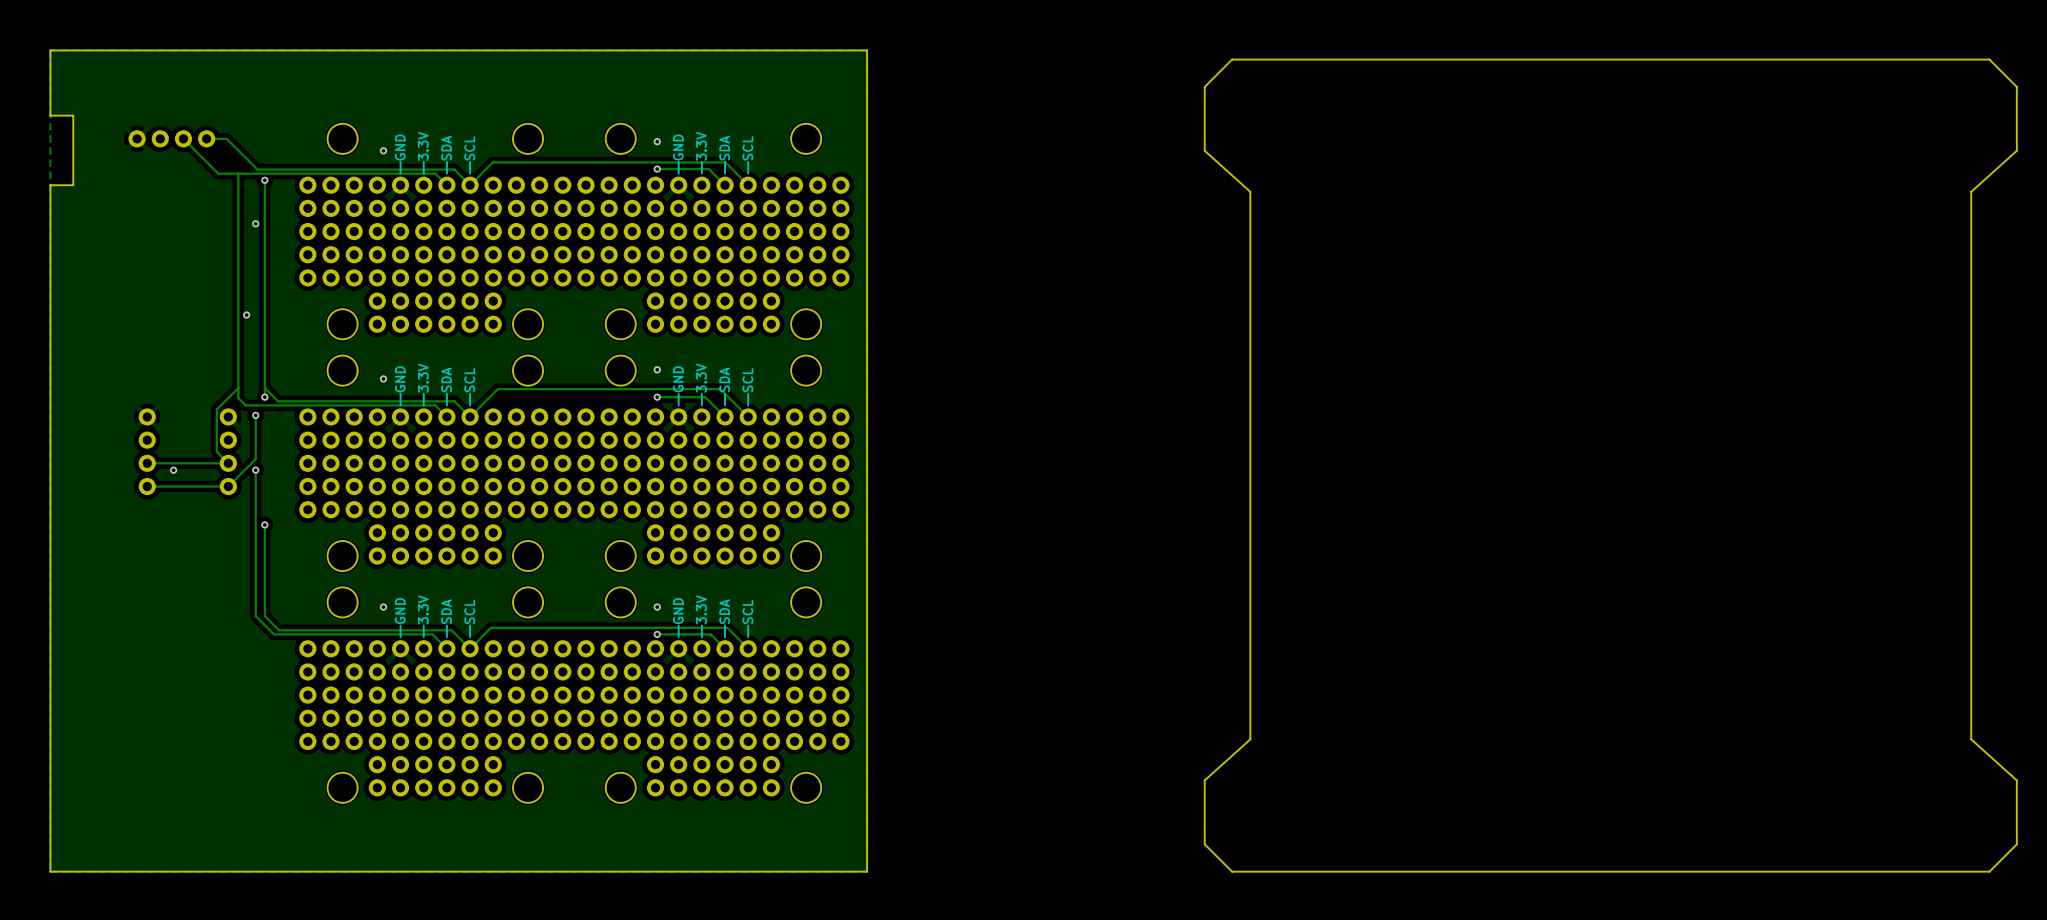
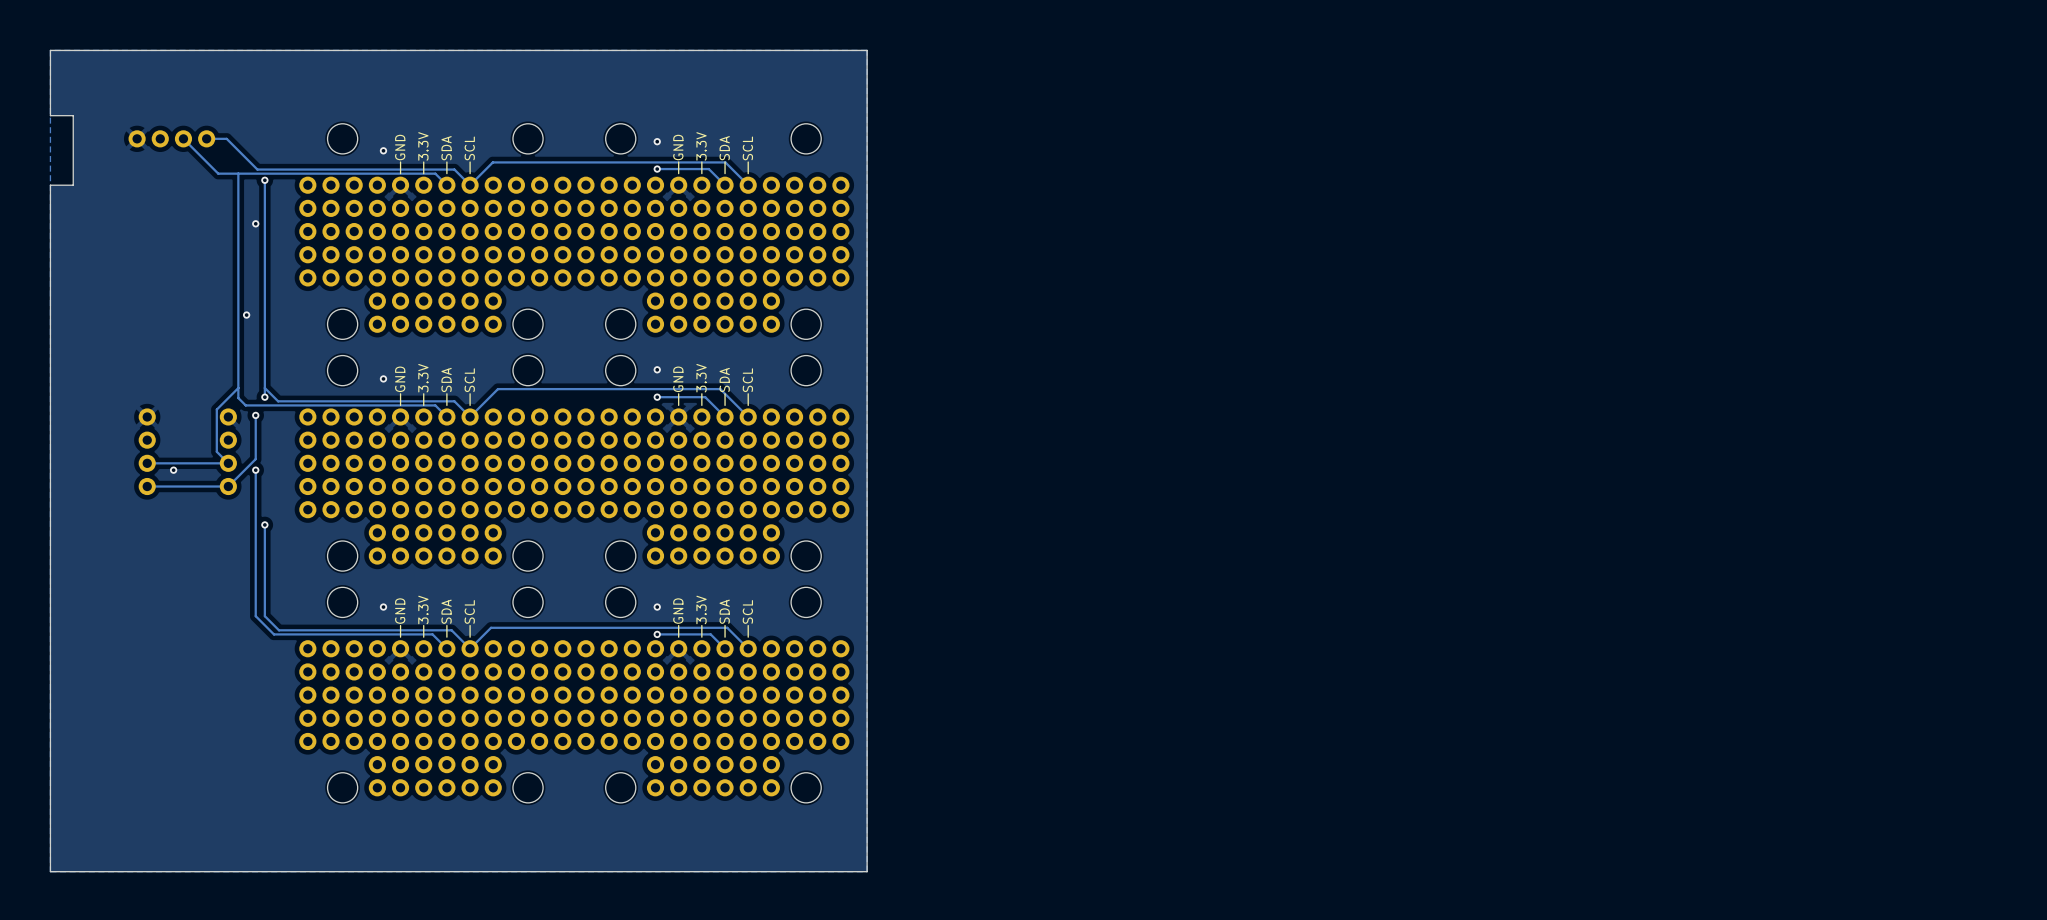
board edge: (1989, 59) (1232, 59) (1204, 86) (1204, 150) (1250, 191) (1250, 739) (1204, 780) (1204, 844) (1232, 871) (1989, 871) (2016, 844) (2016, 780) (1971, 739) (1971, 191) (2016, 150) (2016, 86) (1989, 59) -> none

